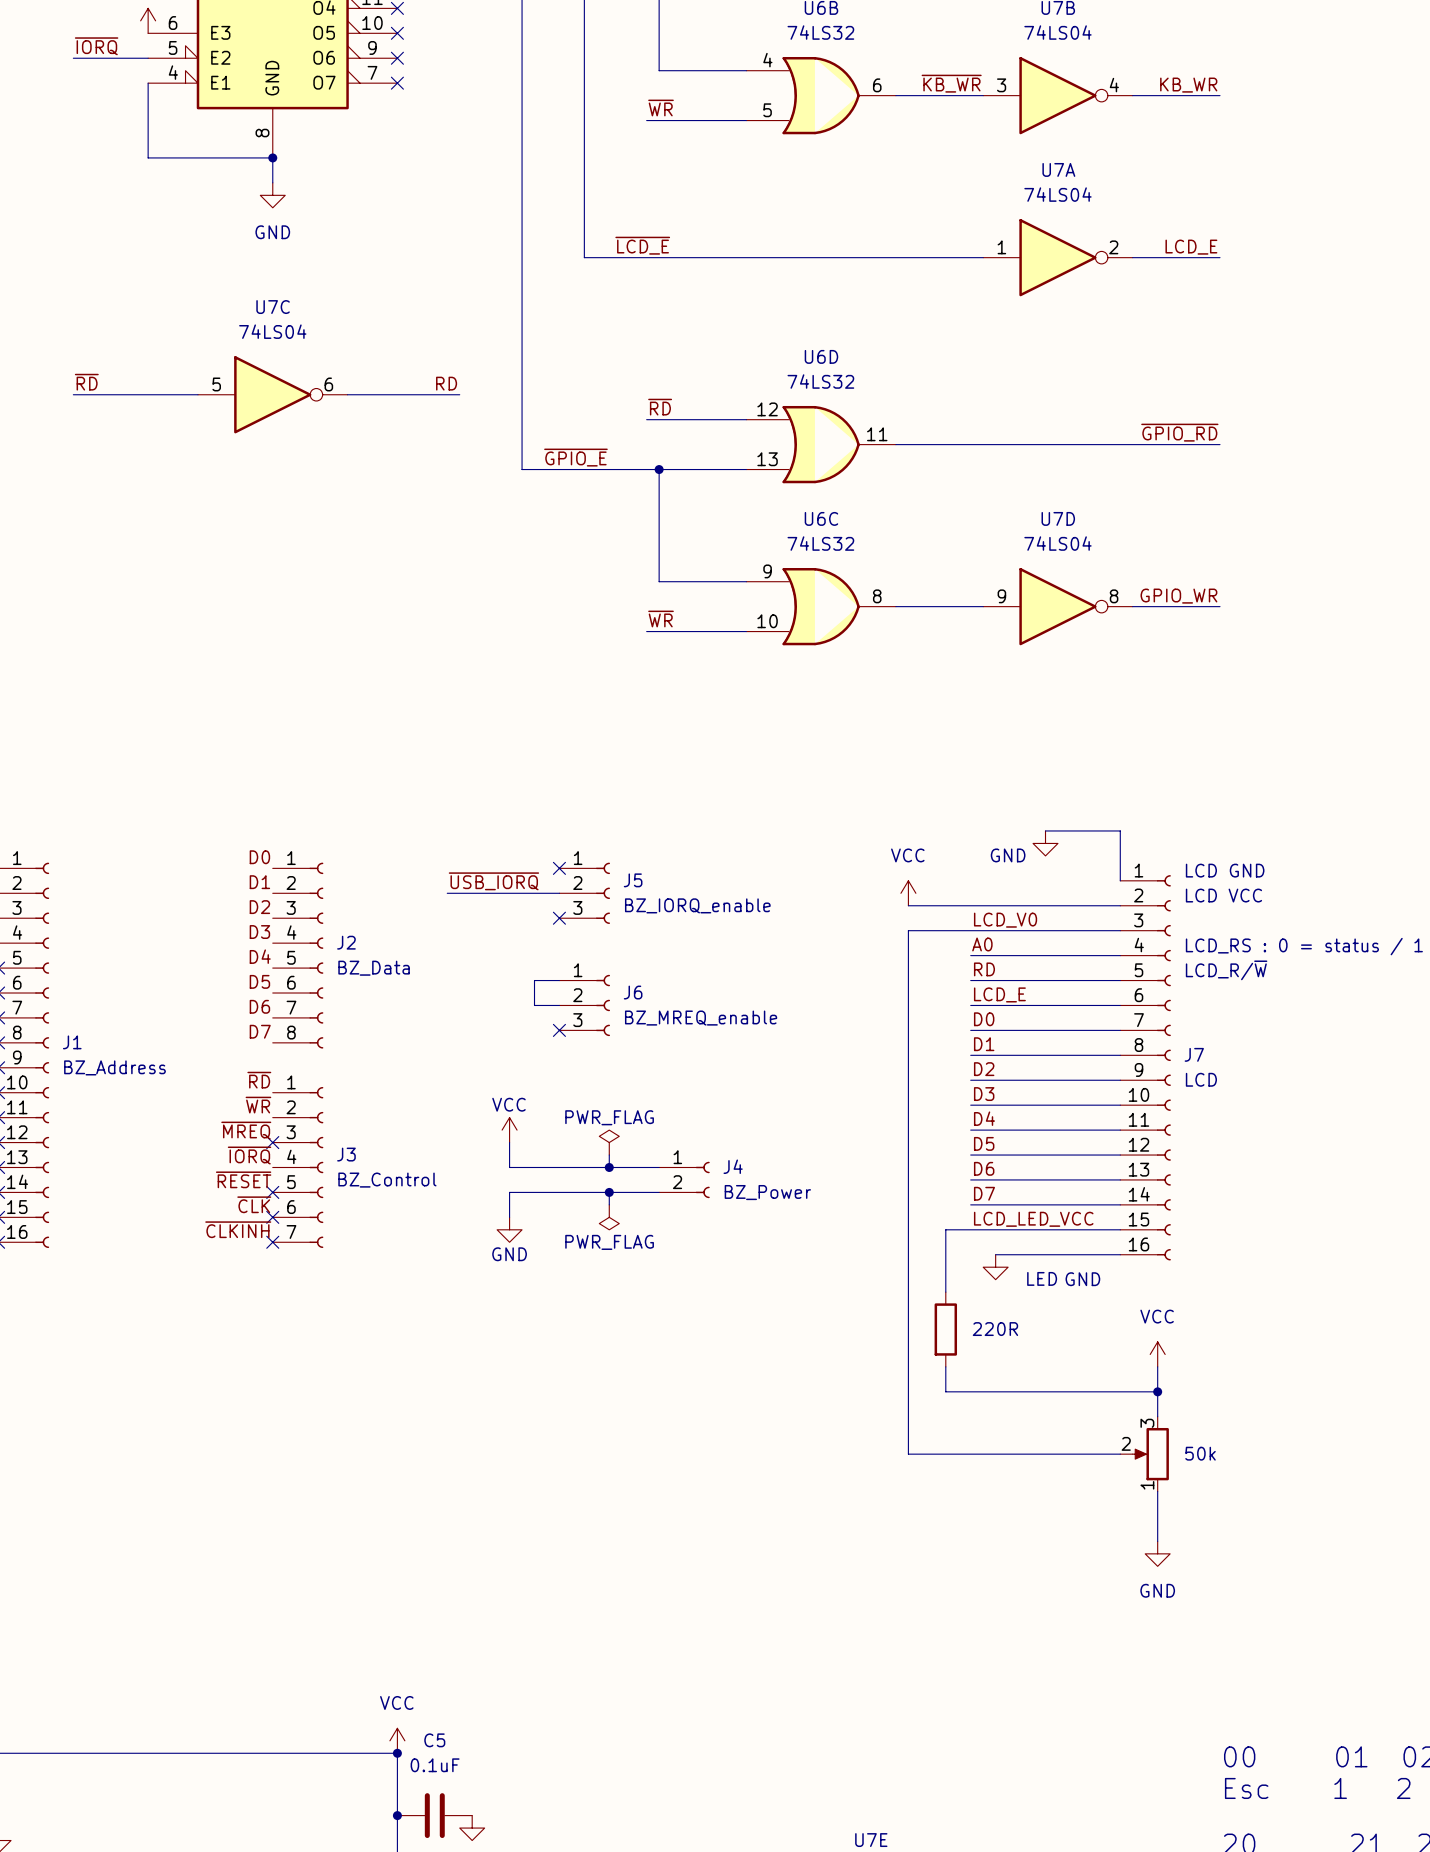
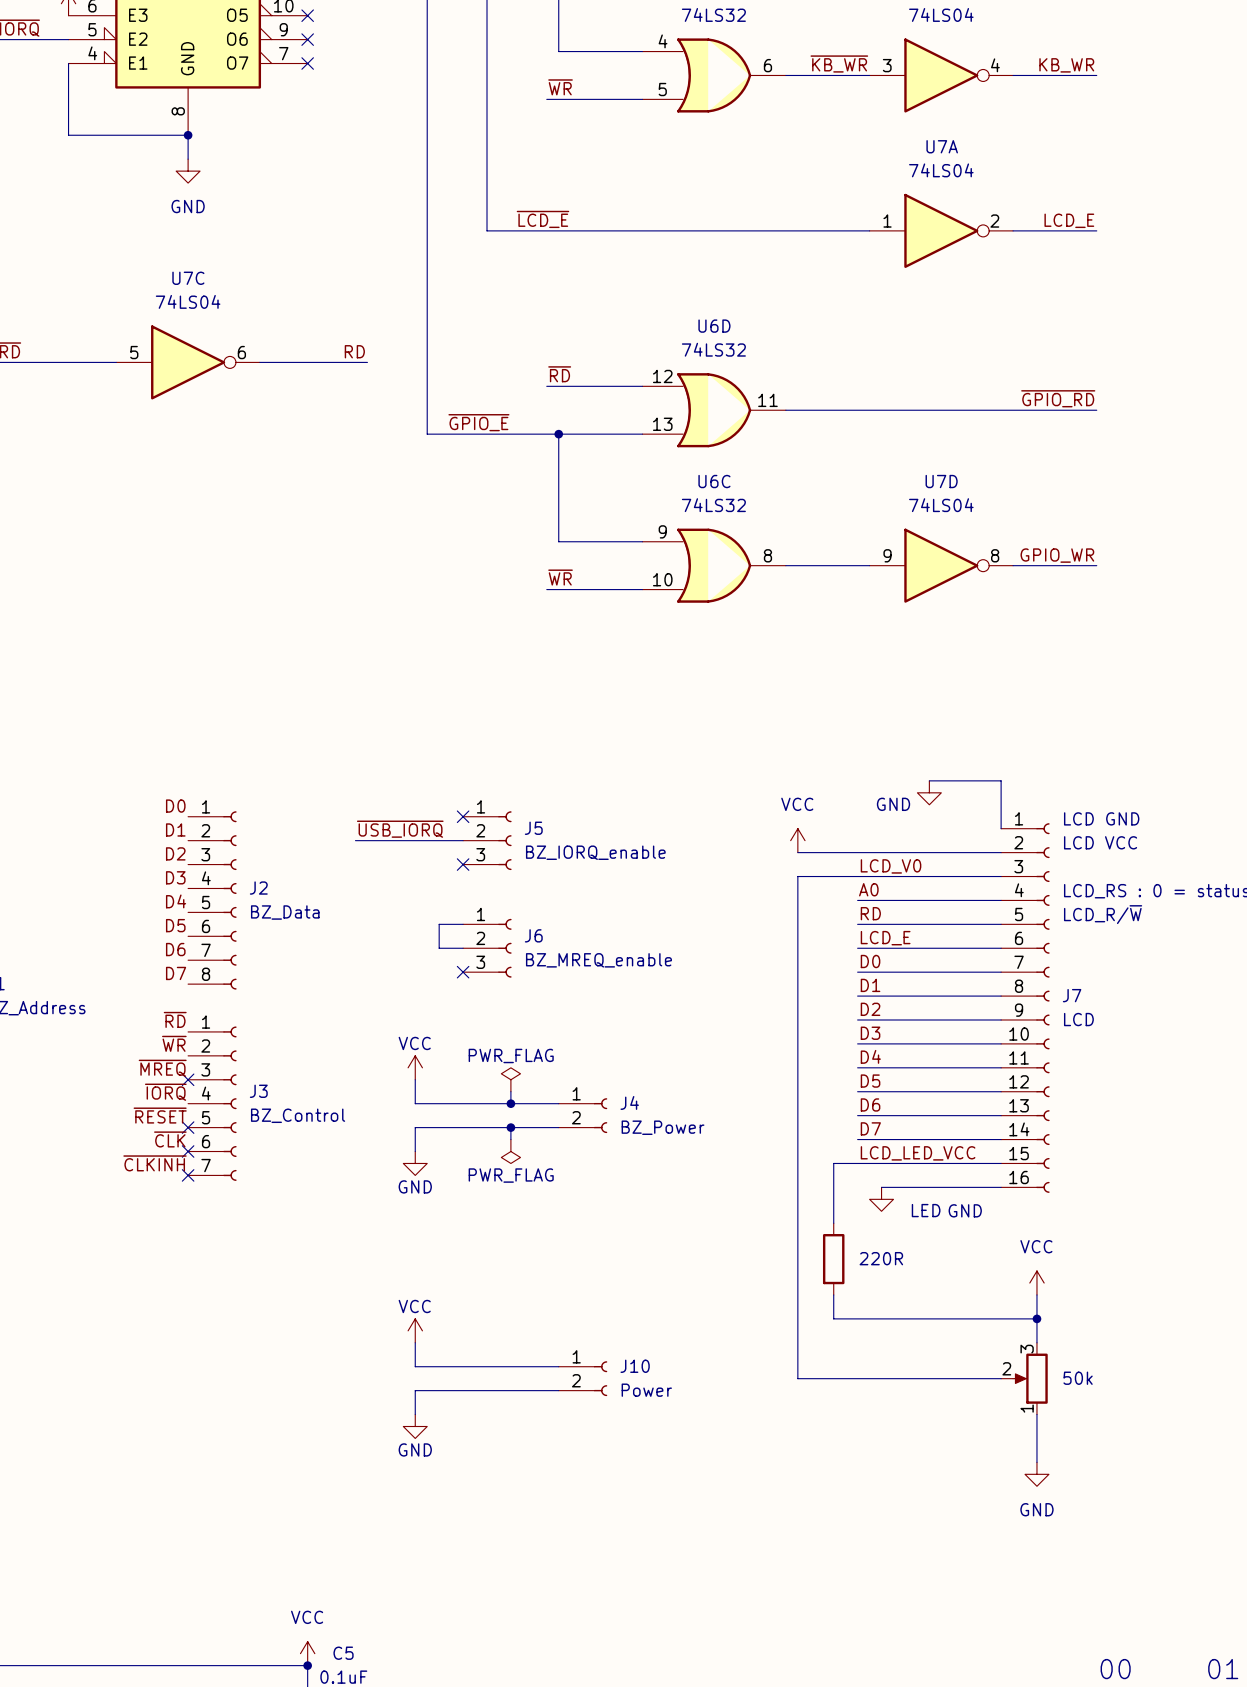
power symbol: none -> VCC (415, 1330)
wire: none -> (415, 1342) (415, 1366) (558, 1366)
J10: none -> Power (583, 1378)
wire: none -> (558, 1390) (415, 1390) (415, 1414)
power symbol: none -> GND (415, 1426)

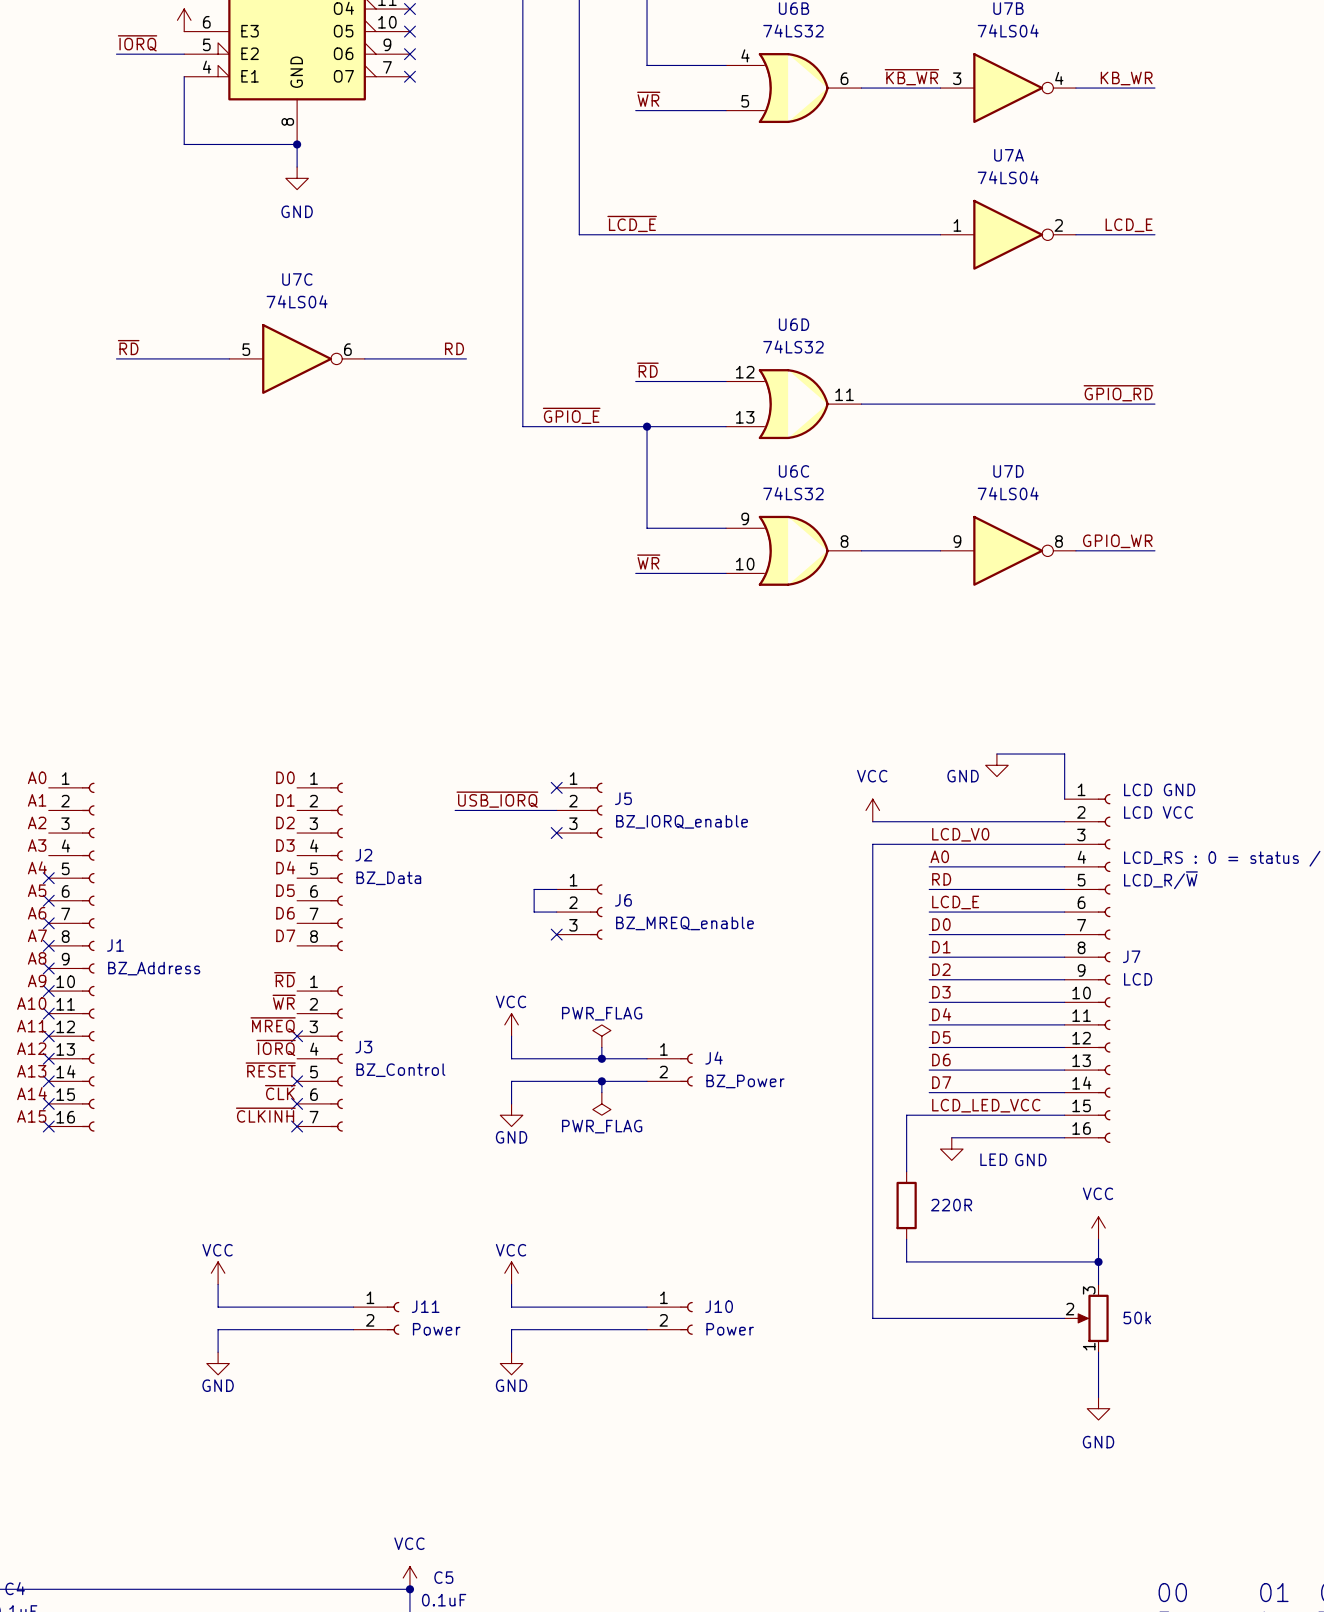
power symbol: none -> VCC (218, 1273)
wire: none -> (218, 1284) (218, 1307) (353, 1307)
J11: none -> Power (376, 1318)
wire: none -> (353, 1329) (218, 1329) (218, 1352)
power symbol: none -> GND (218, 1363)

